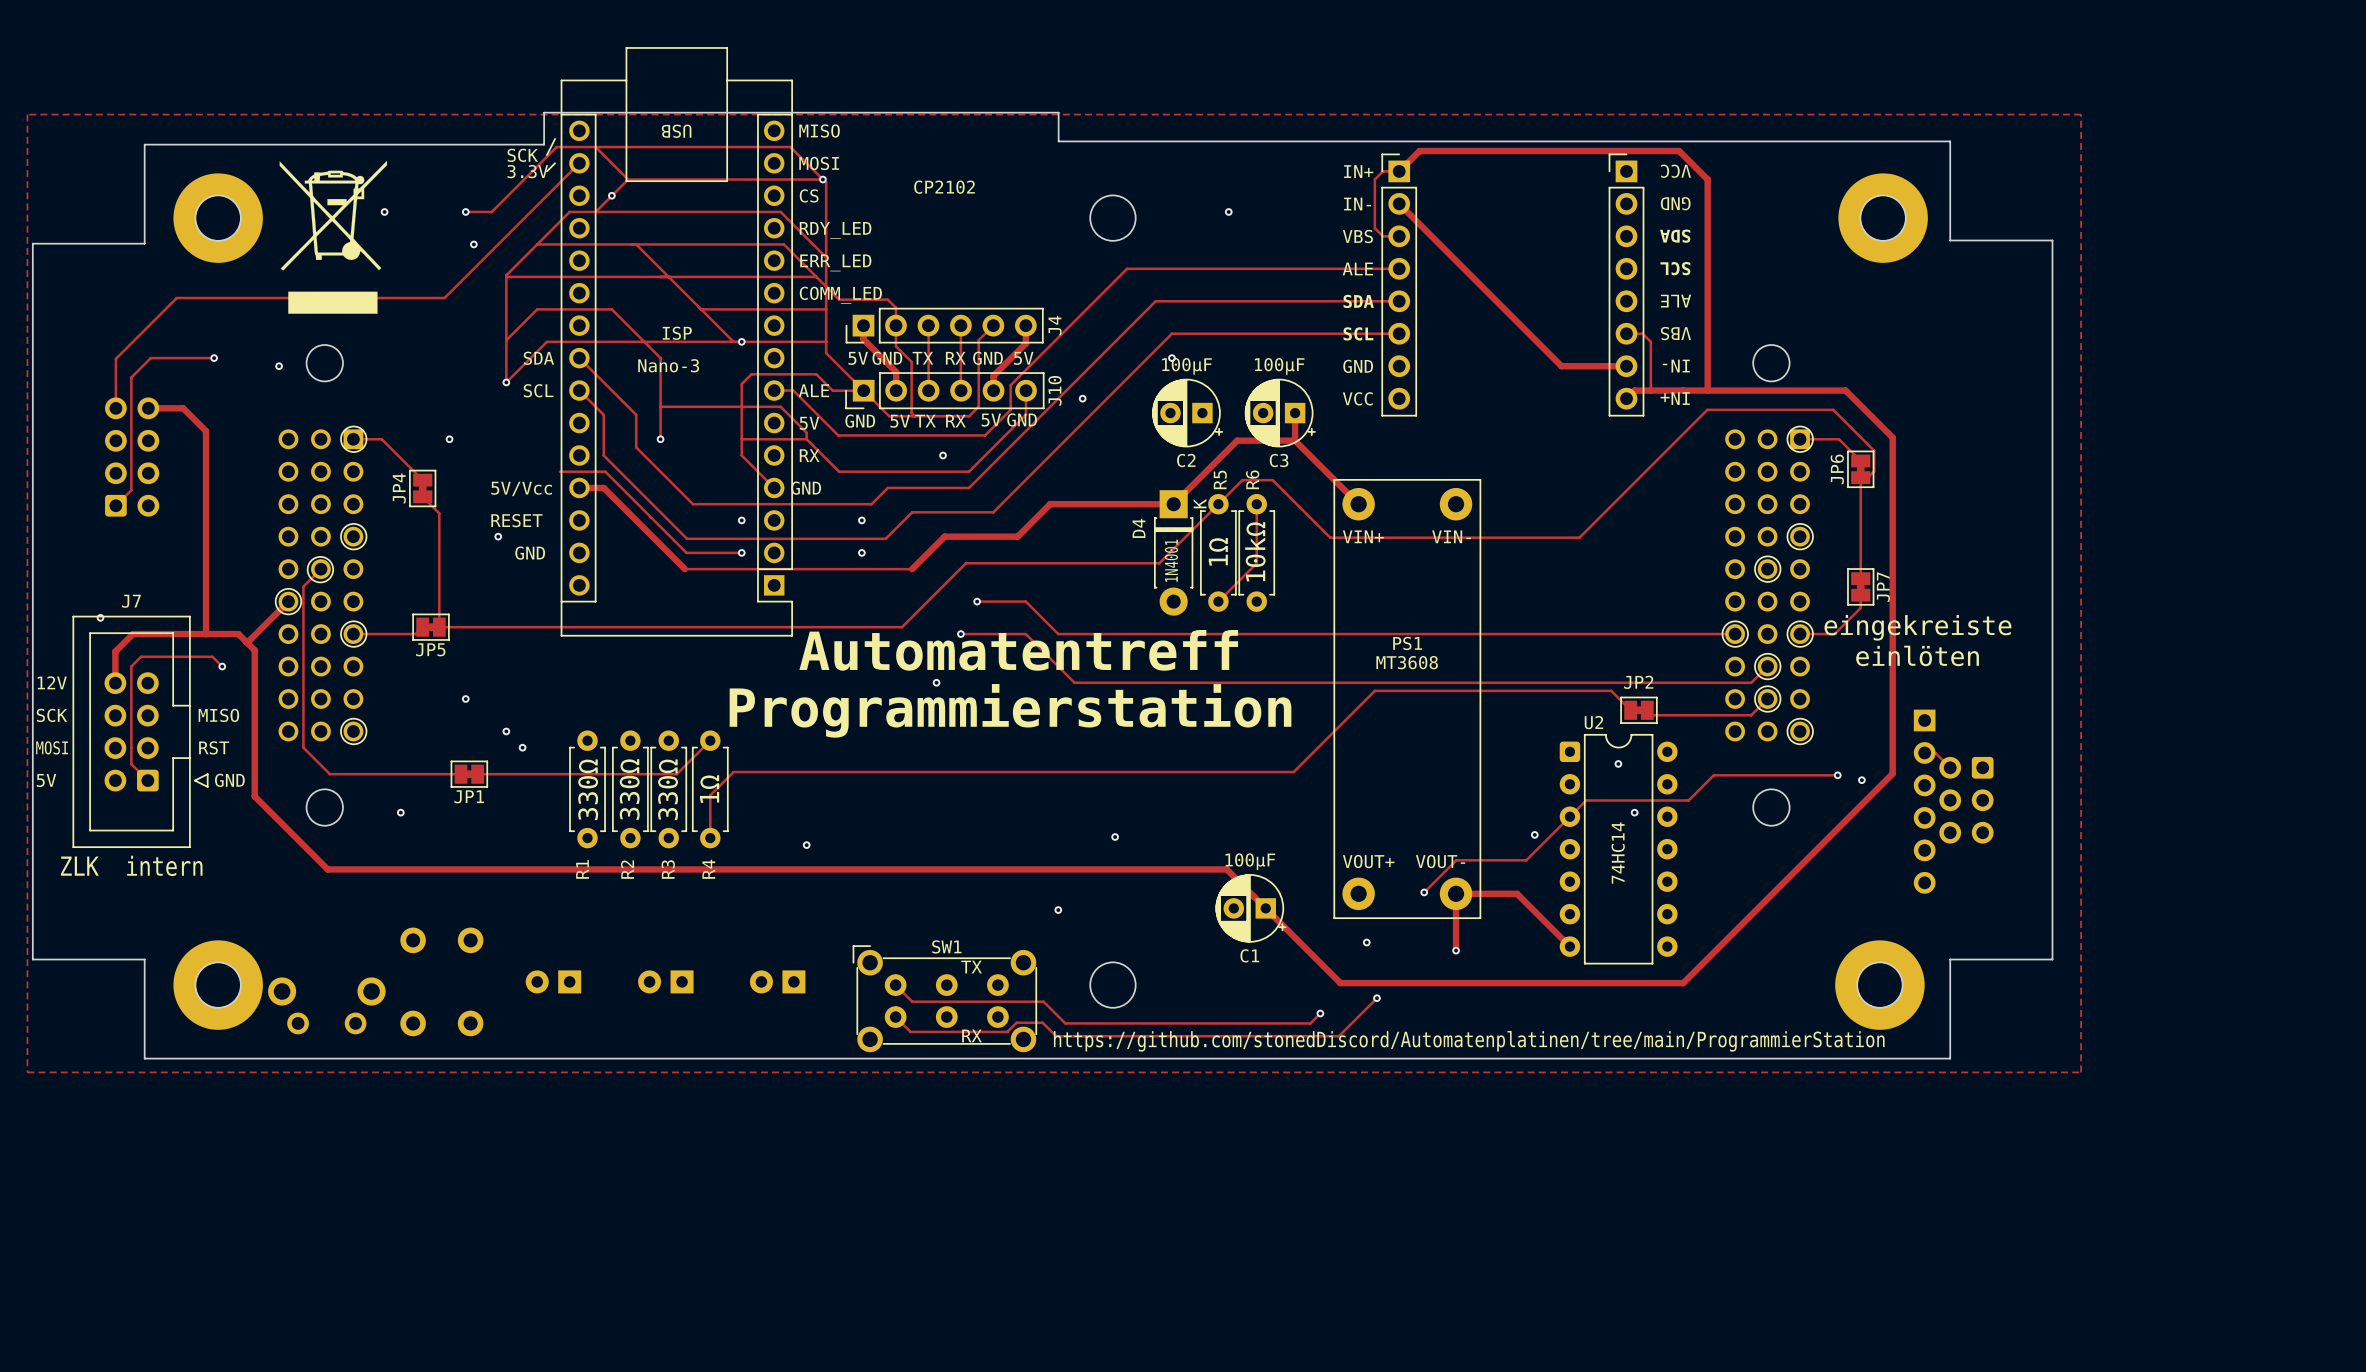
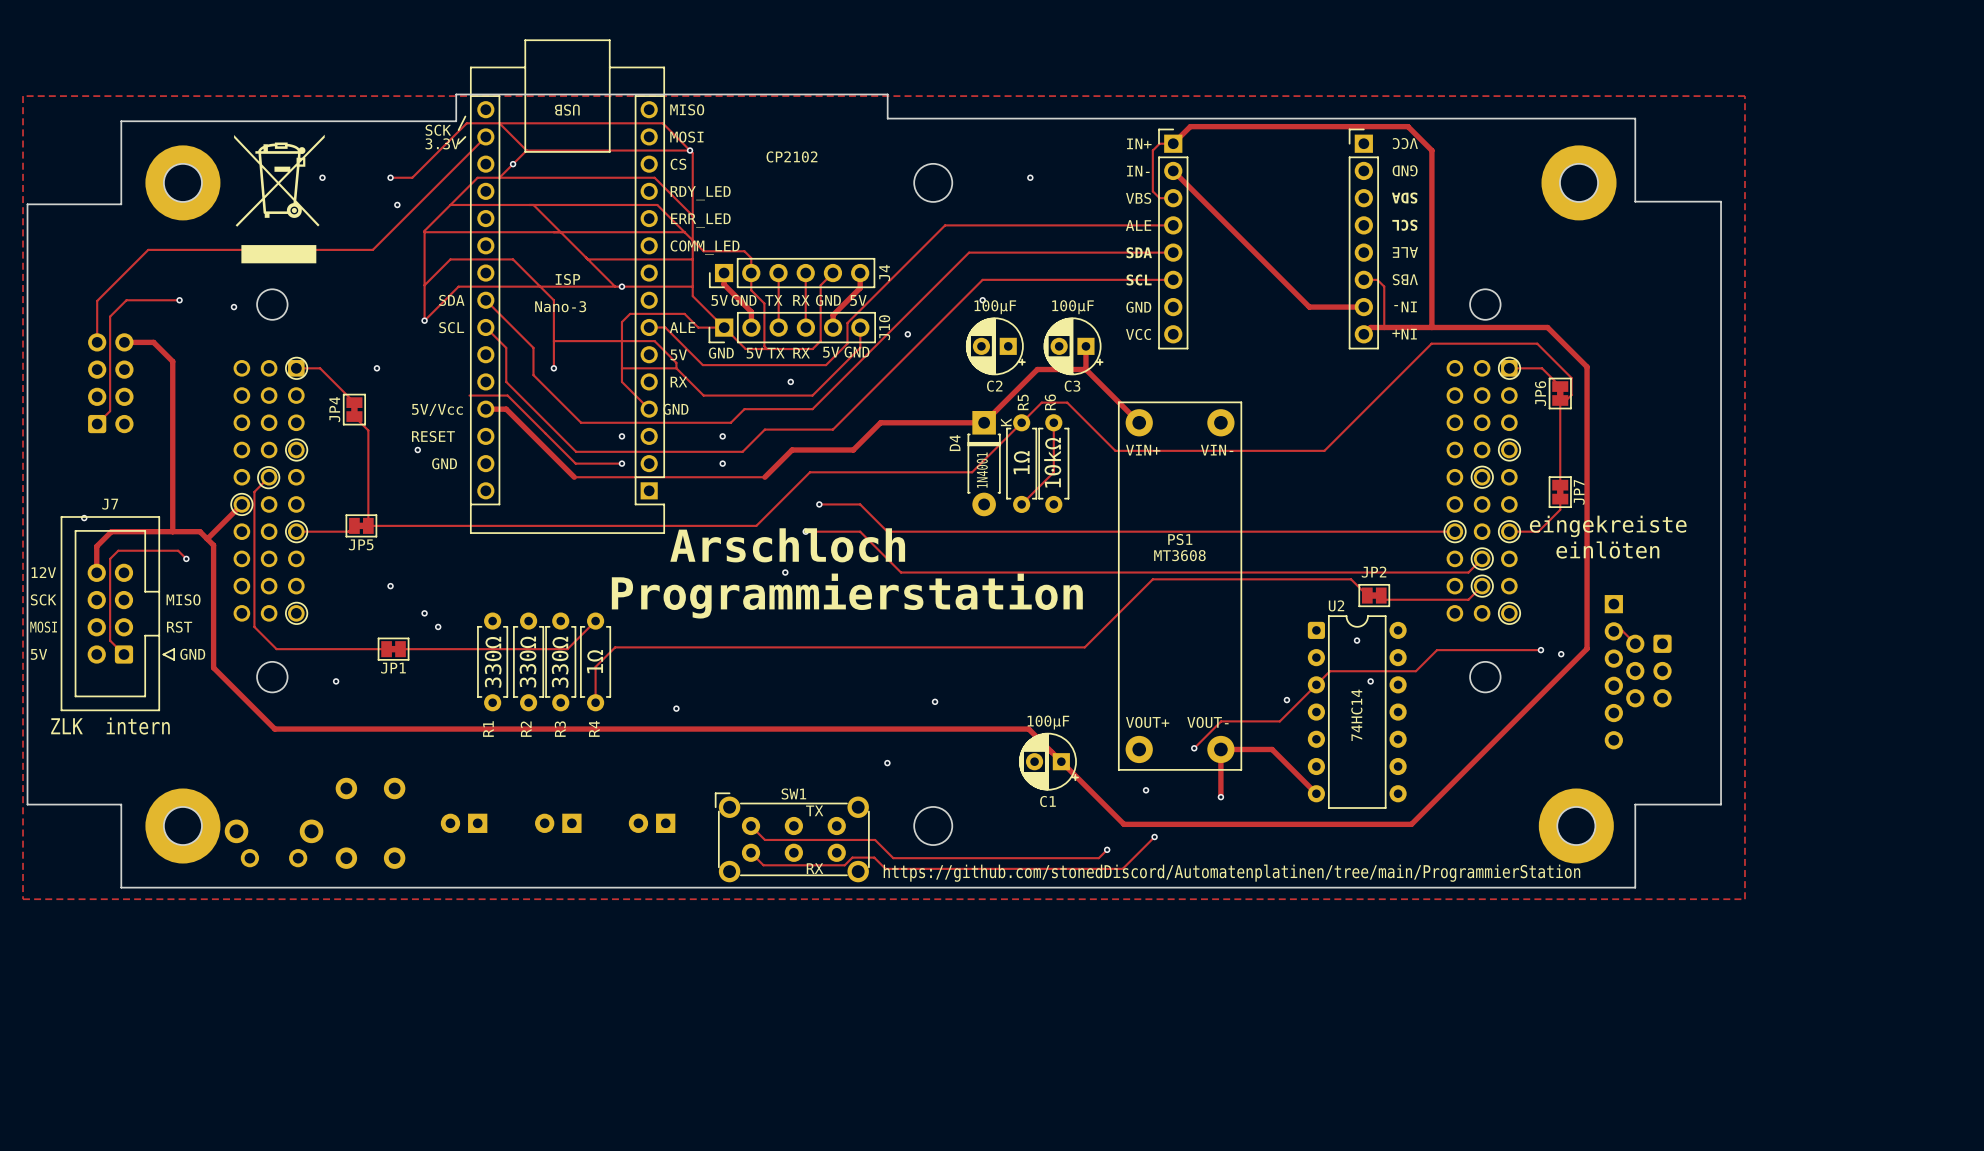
drawing shape: [279, 160, 388, 314] -> [234, 134, 325, 264]
text: Automatentreff (1018, 650) -> Arschloch (787, 545)

